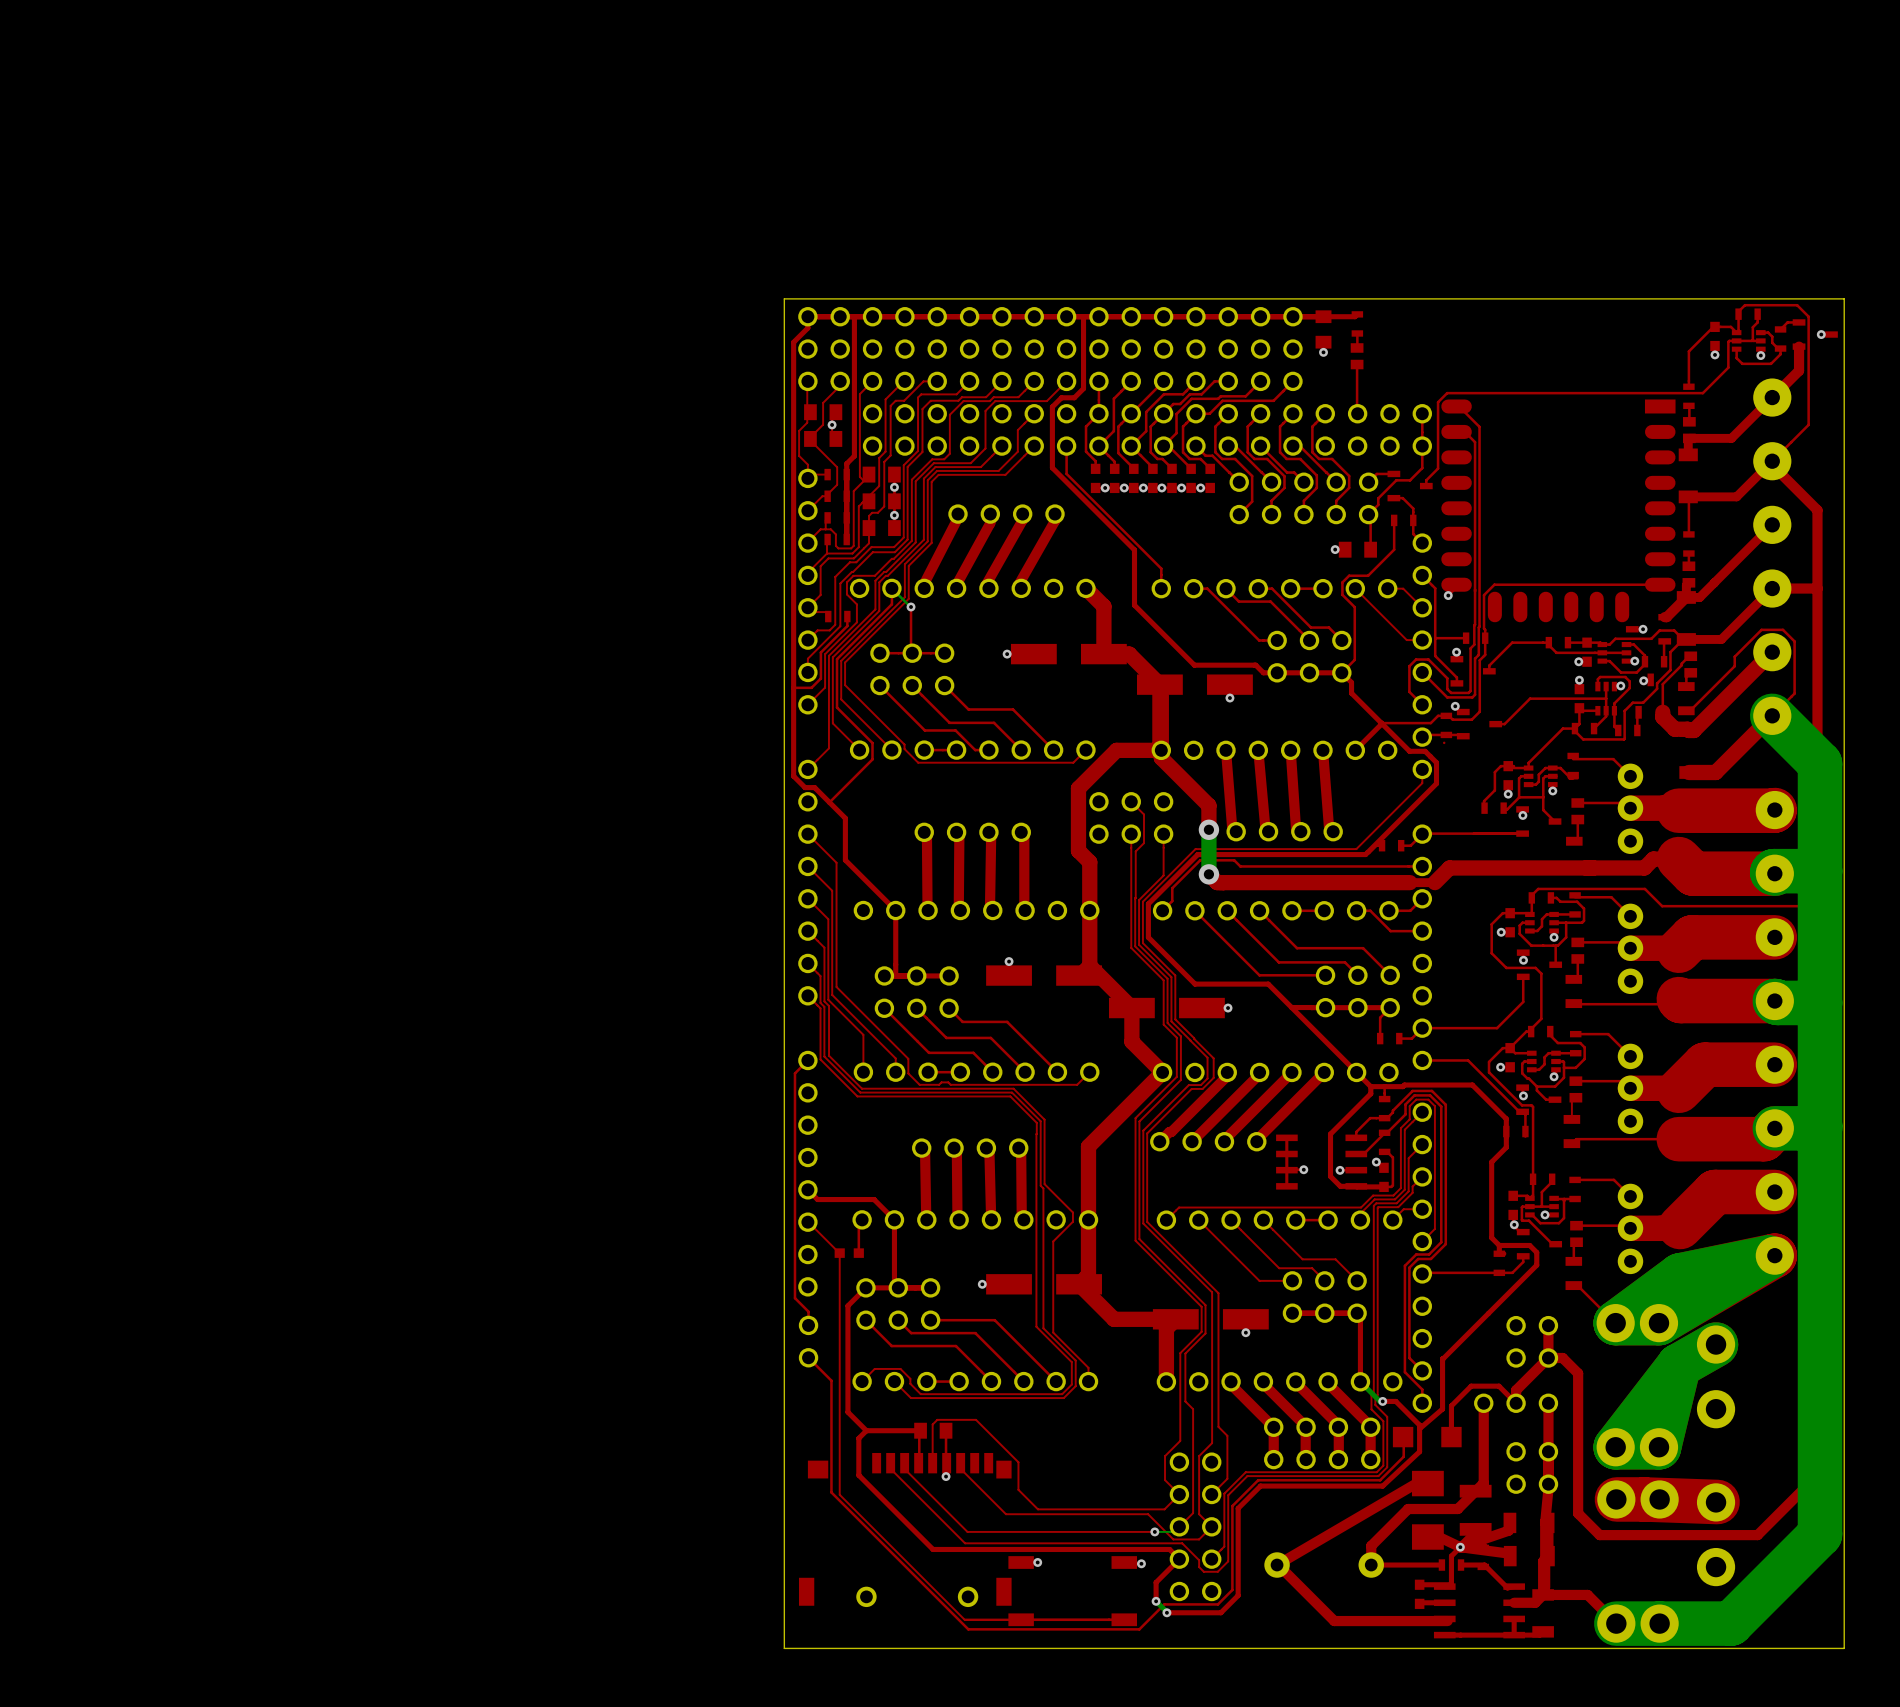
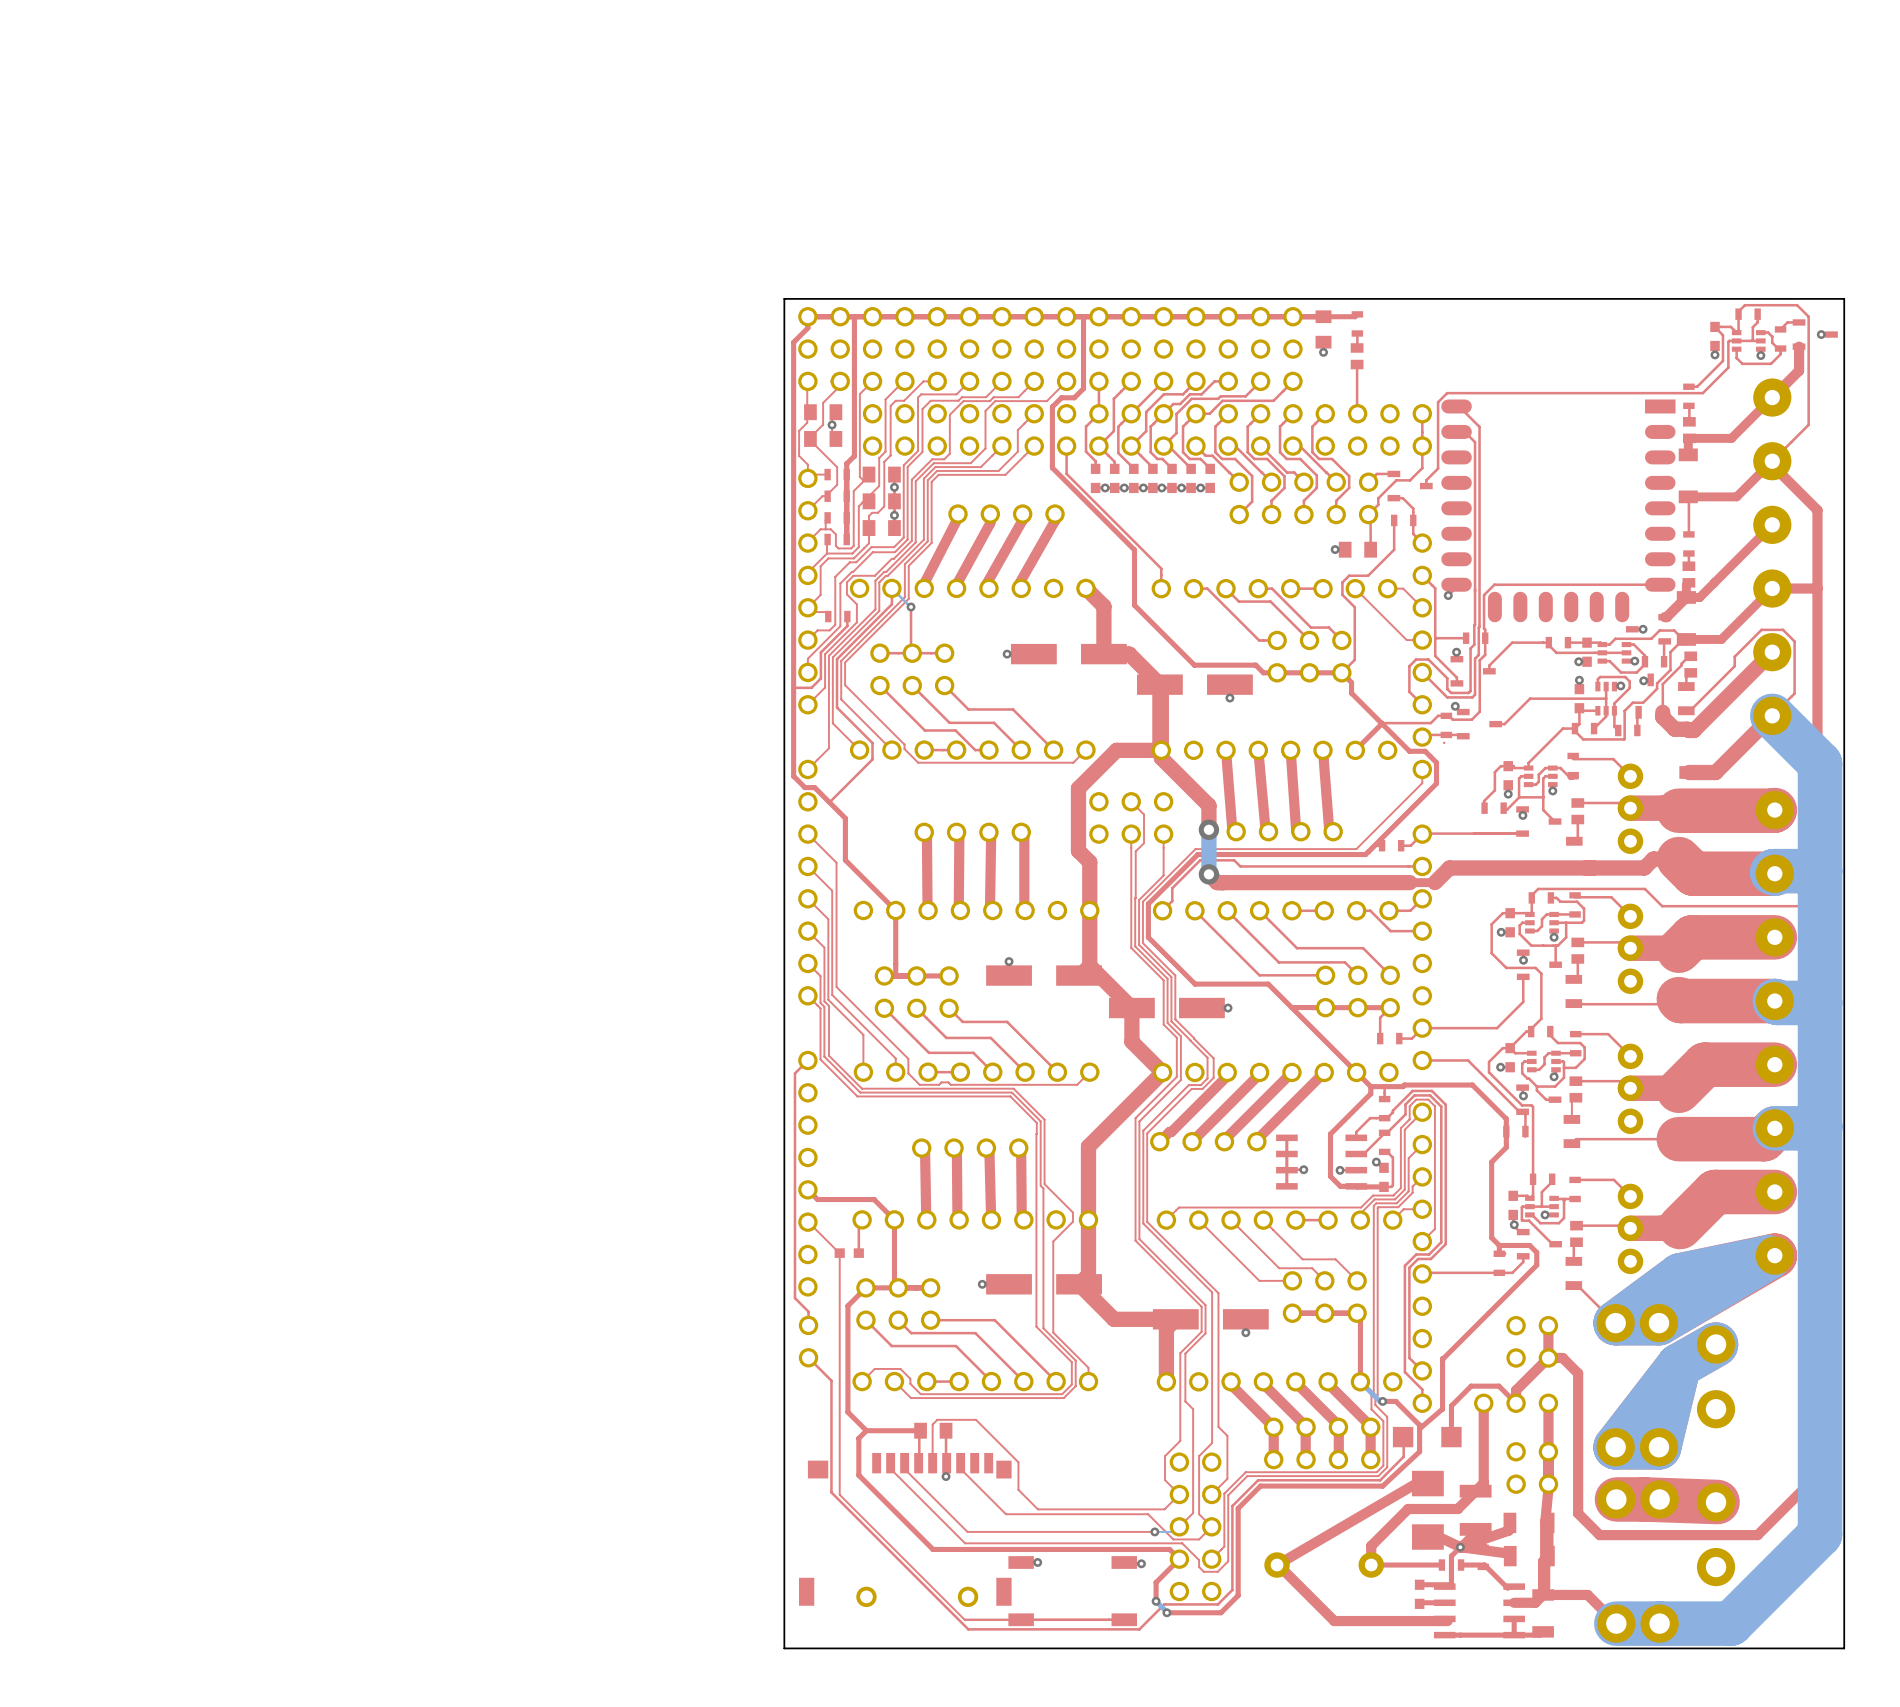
top track: (1713, 326) (1688, 351) (1688, 386) -> (1715, 326) (1722, 335) (1722, 360) (1697, 386) (1688, 386)

